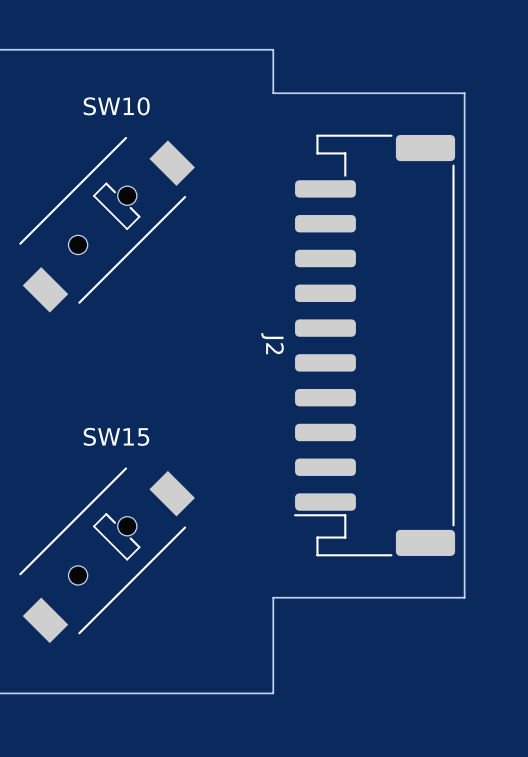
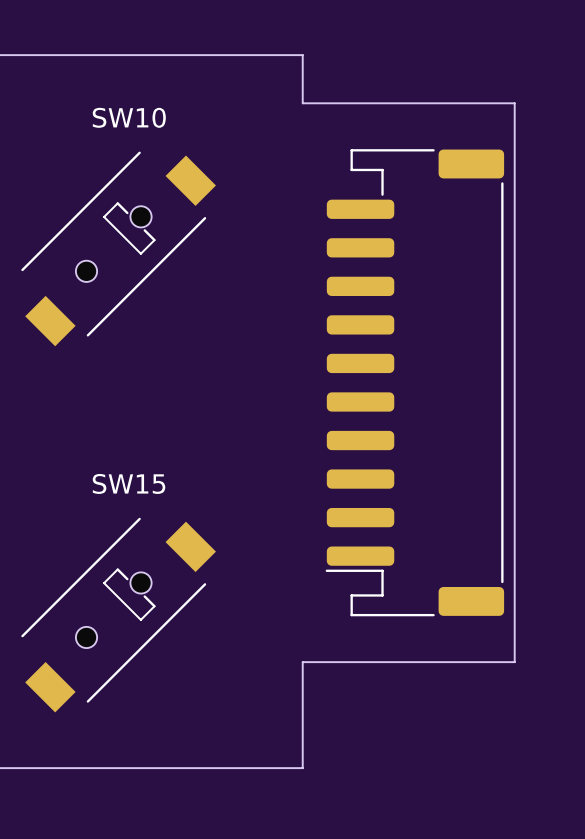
J2 name: J2 (272, 343) -> none

